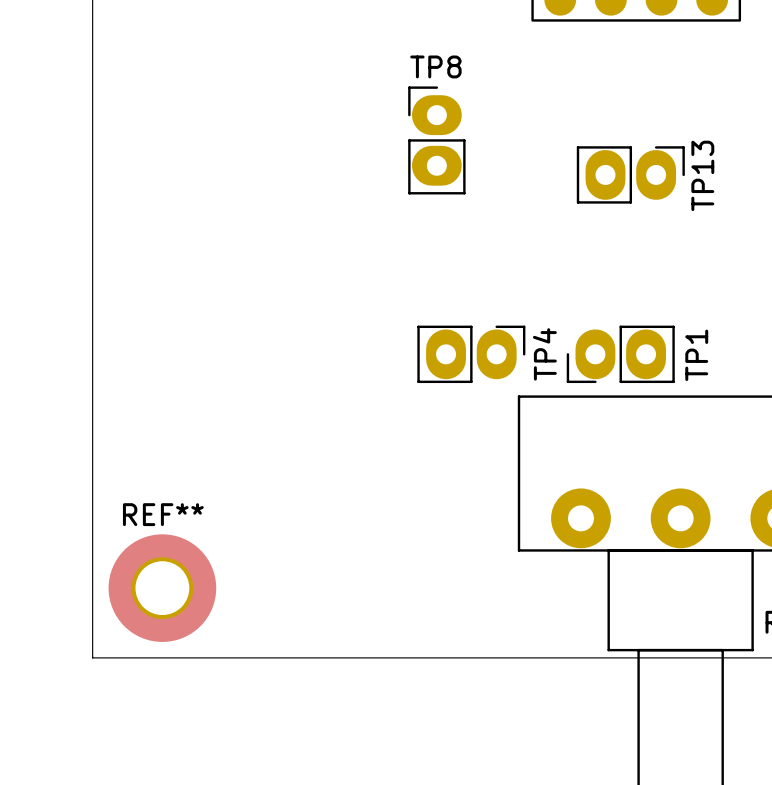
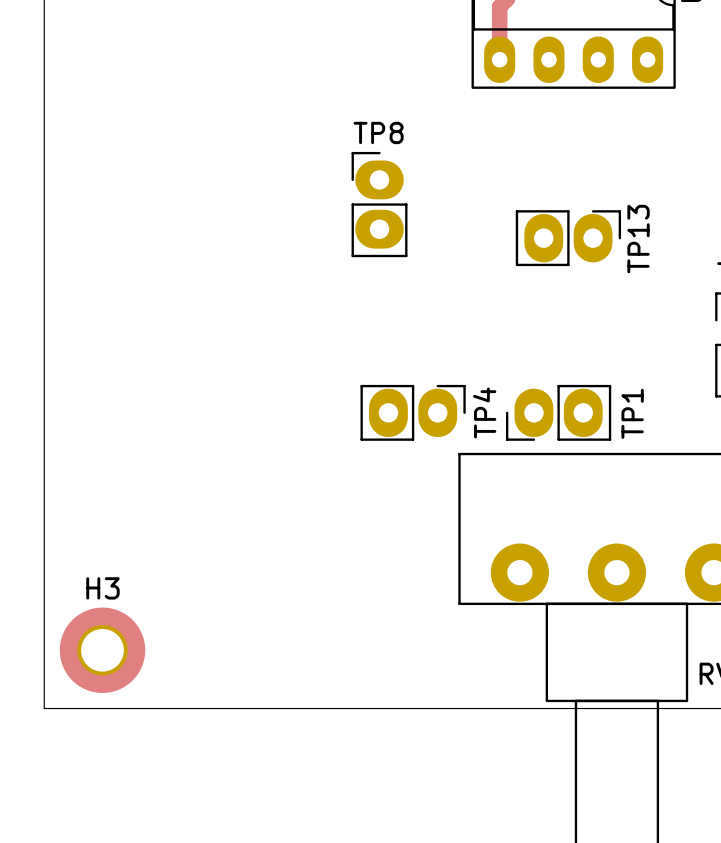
REF**: (162, 588) -> none
H3: none -> (102, 650)

